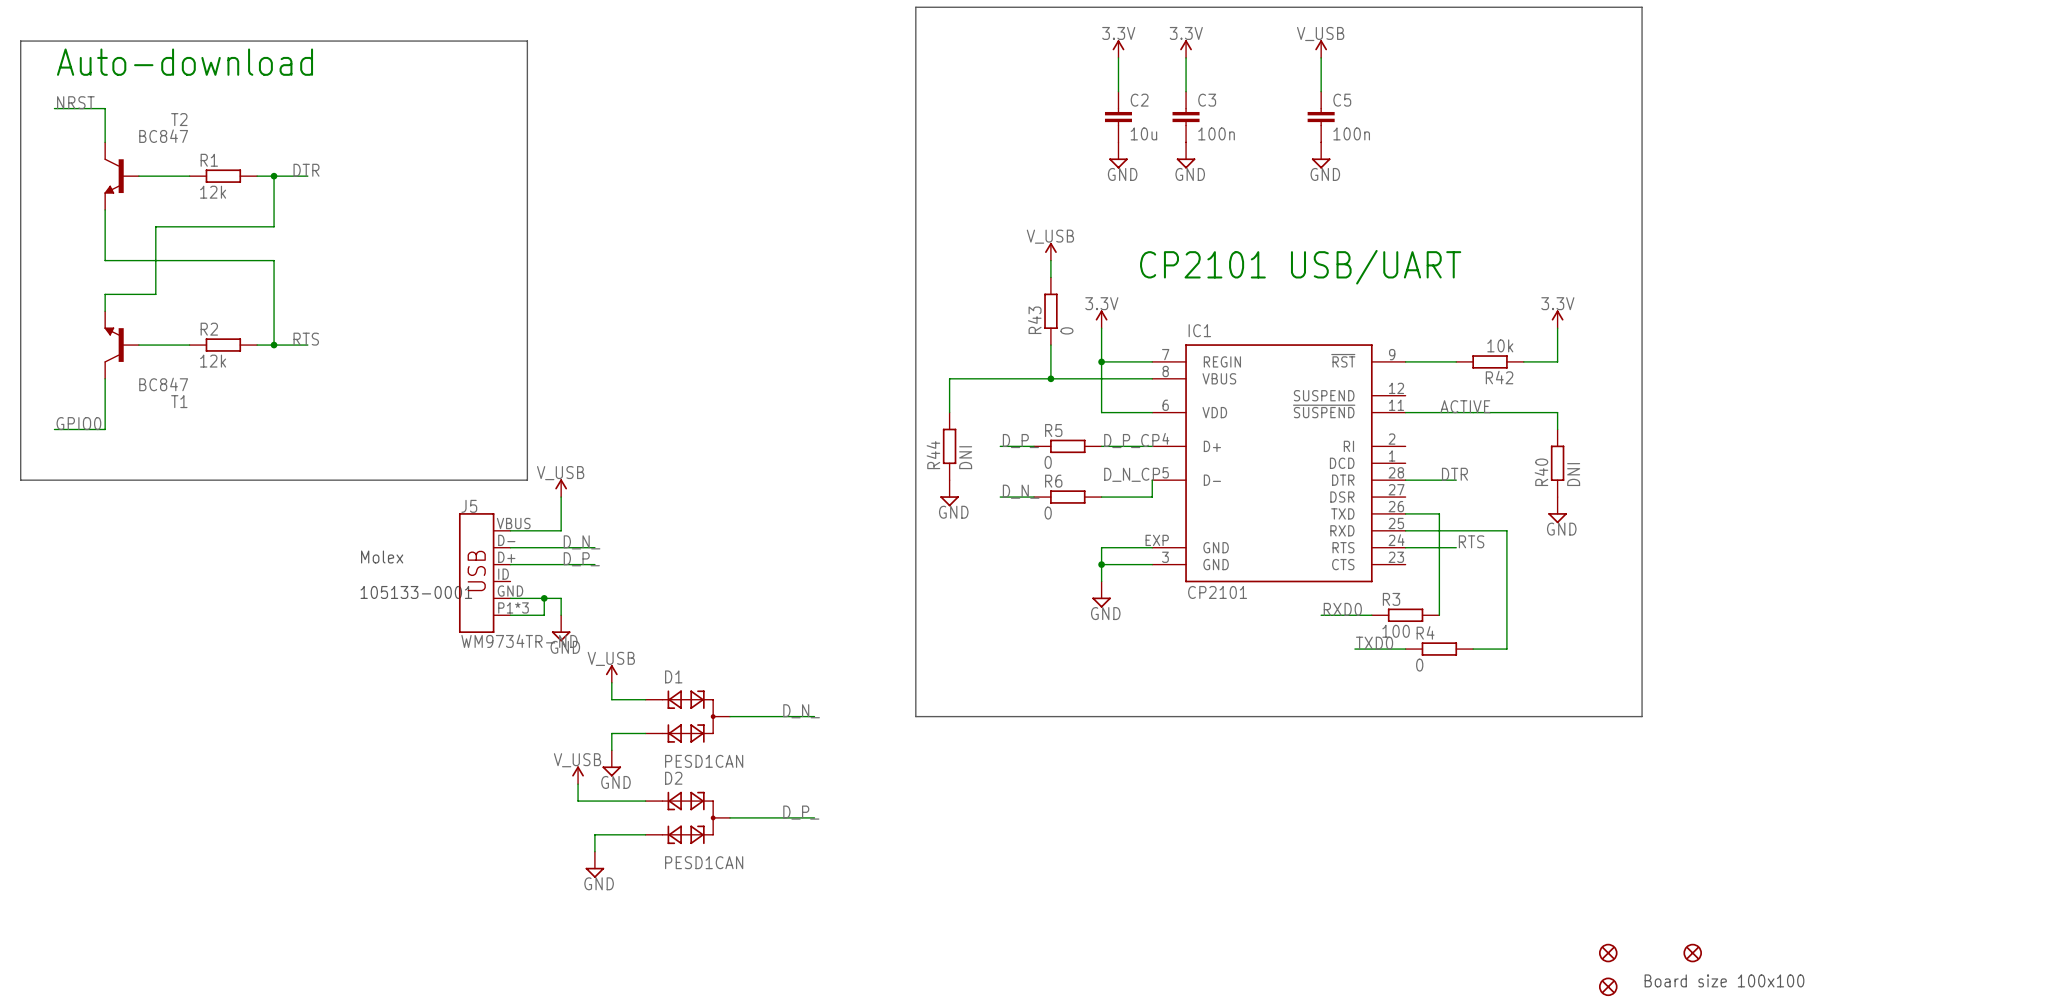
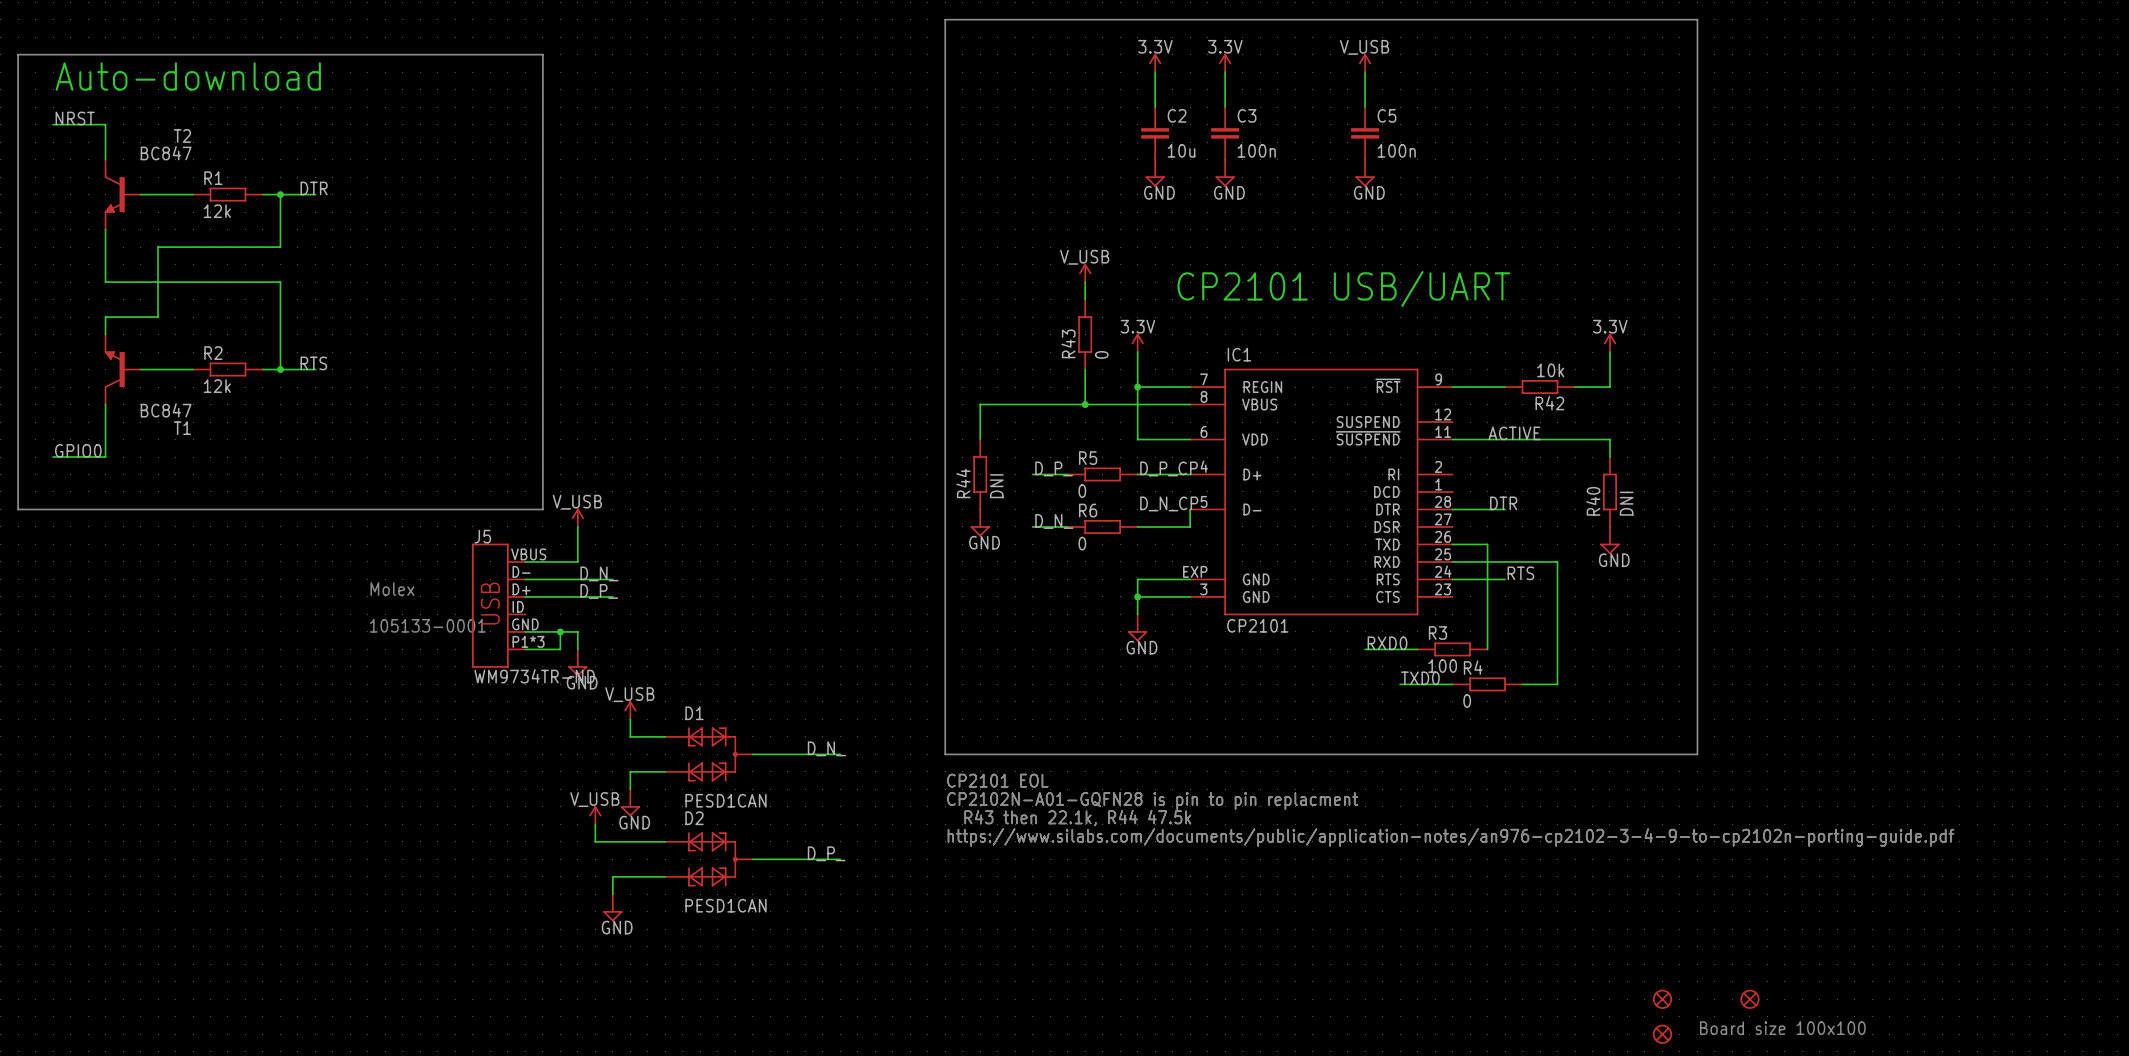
text: none -> CP2101 EOL (997, 780)
text: none -> CP2102N-A01-GQFN28 is pin to pin replacment (1152, 801)
text: none -> R43 then 22.1k, R44 47.5k (1077, 817)
text: none -> https://www.silabs.com/documents/public/application-notes/an976-cp2102-3-4-9-to-cp2102n-porting-guide.pdf (1451, 837)

